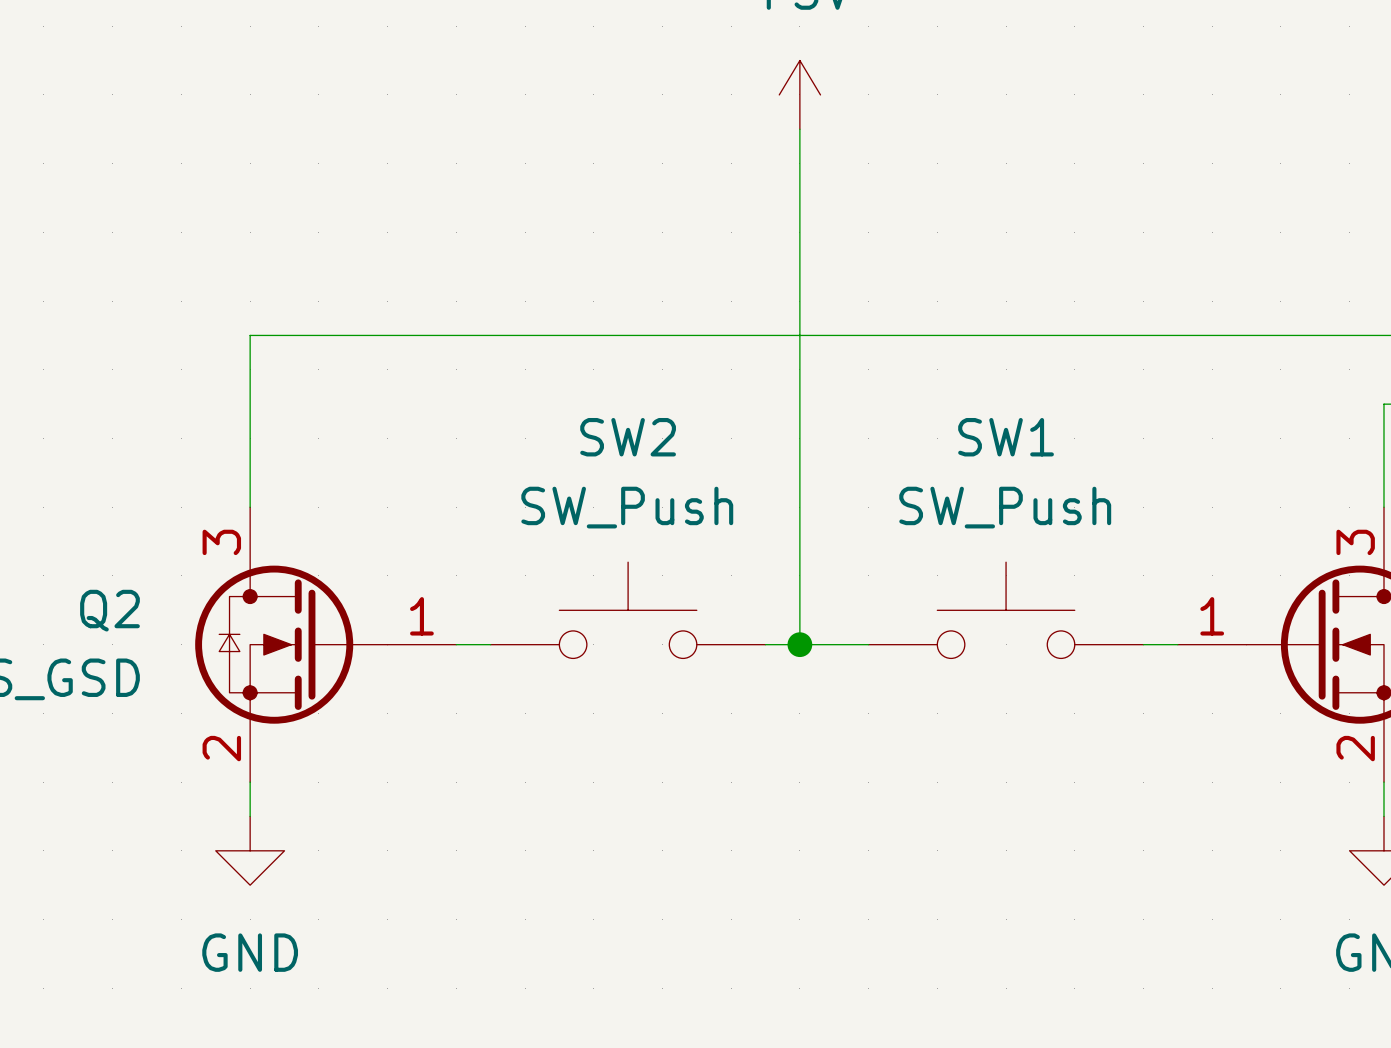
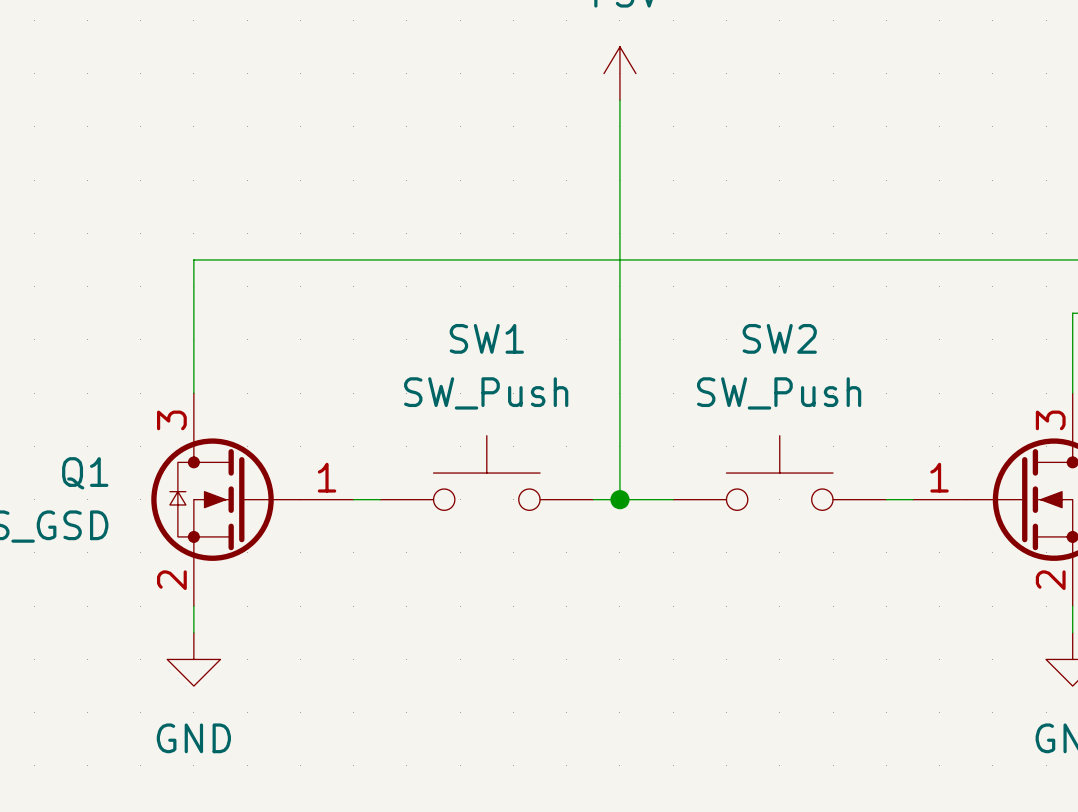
SW2 name: SW2 (628, 437) -> SW1 (486, 338)
SW1 name: SW1 (1006, 437) -> SW2 (779, 338)
Q2 name: Q2 (109, 610) -> Q1 (85, 473)

